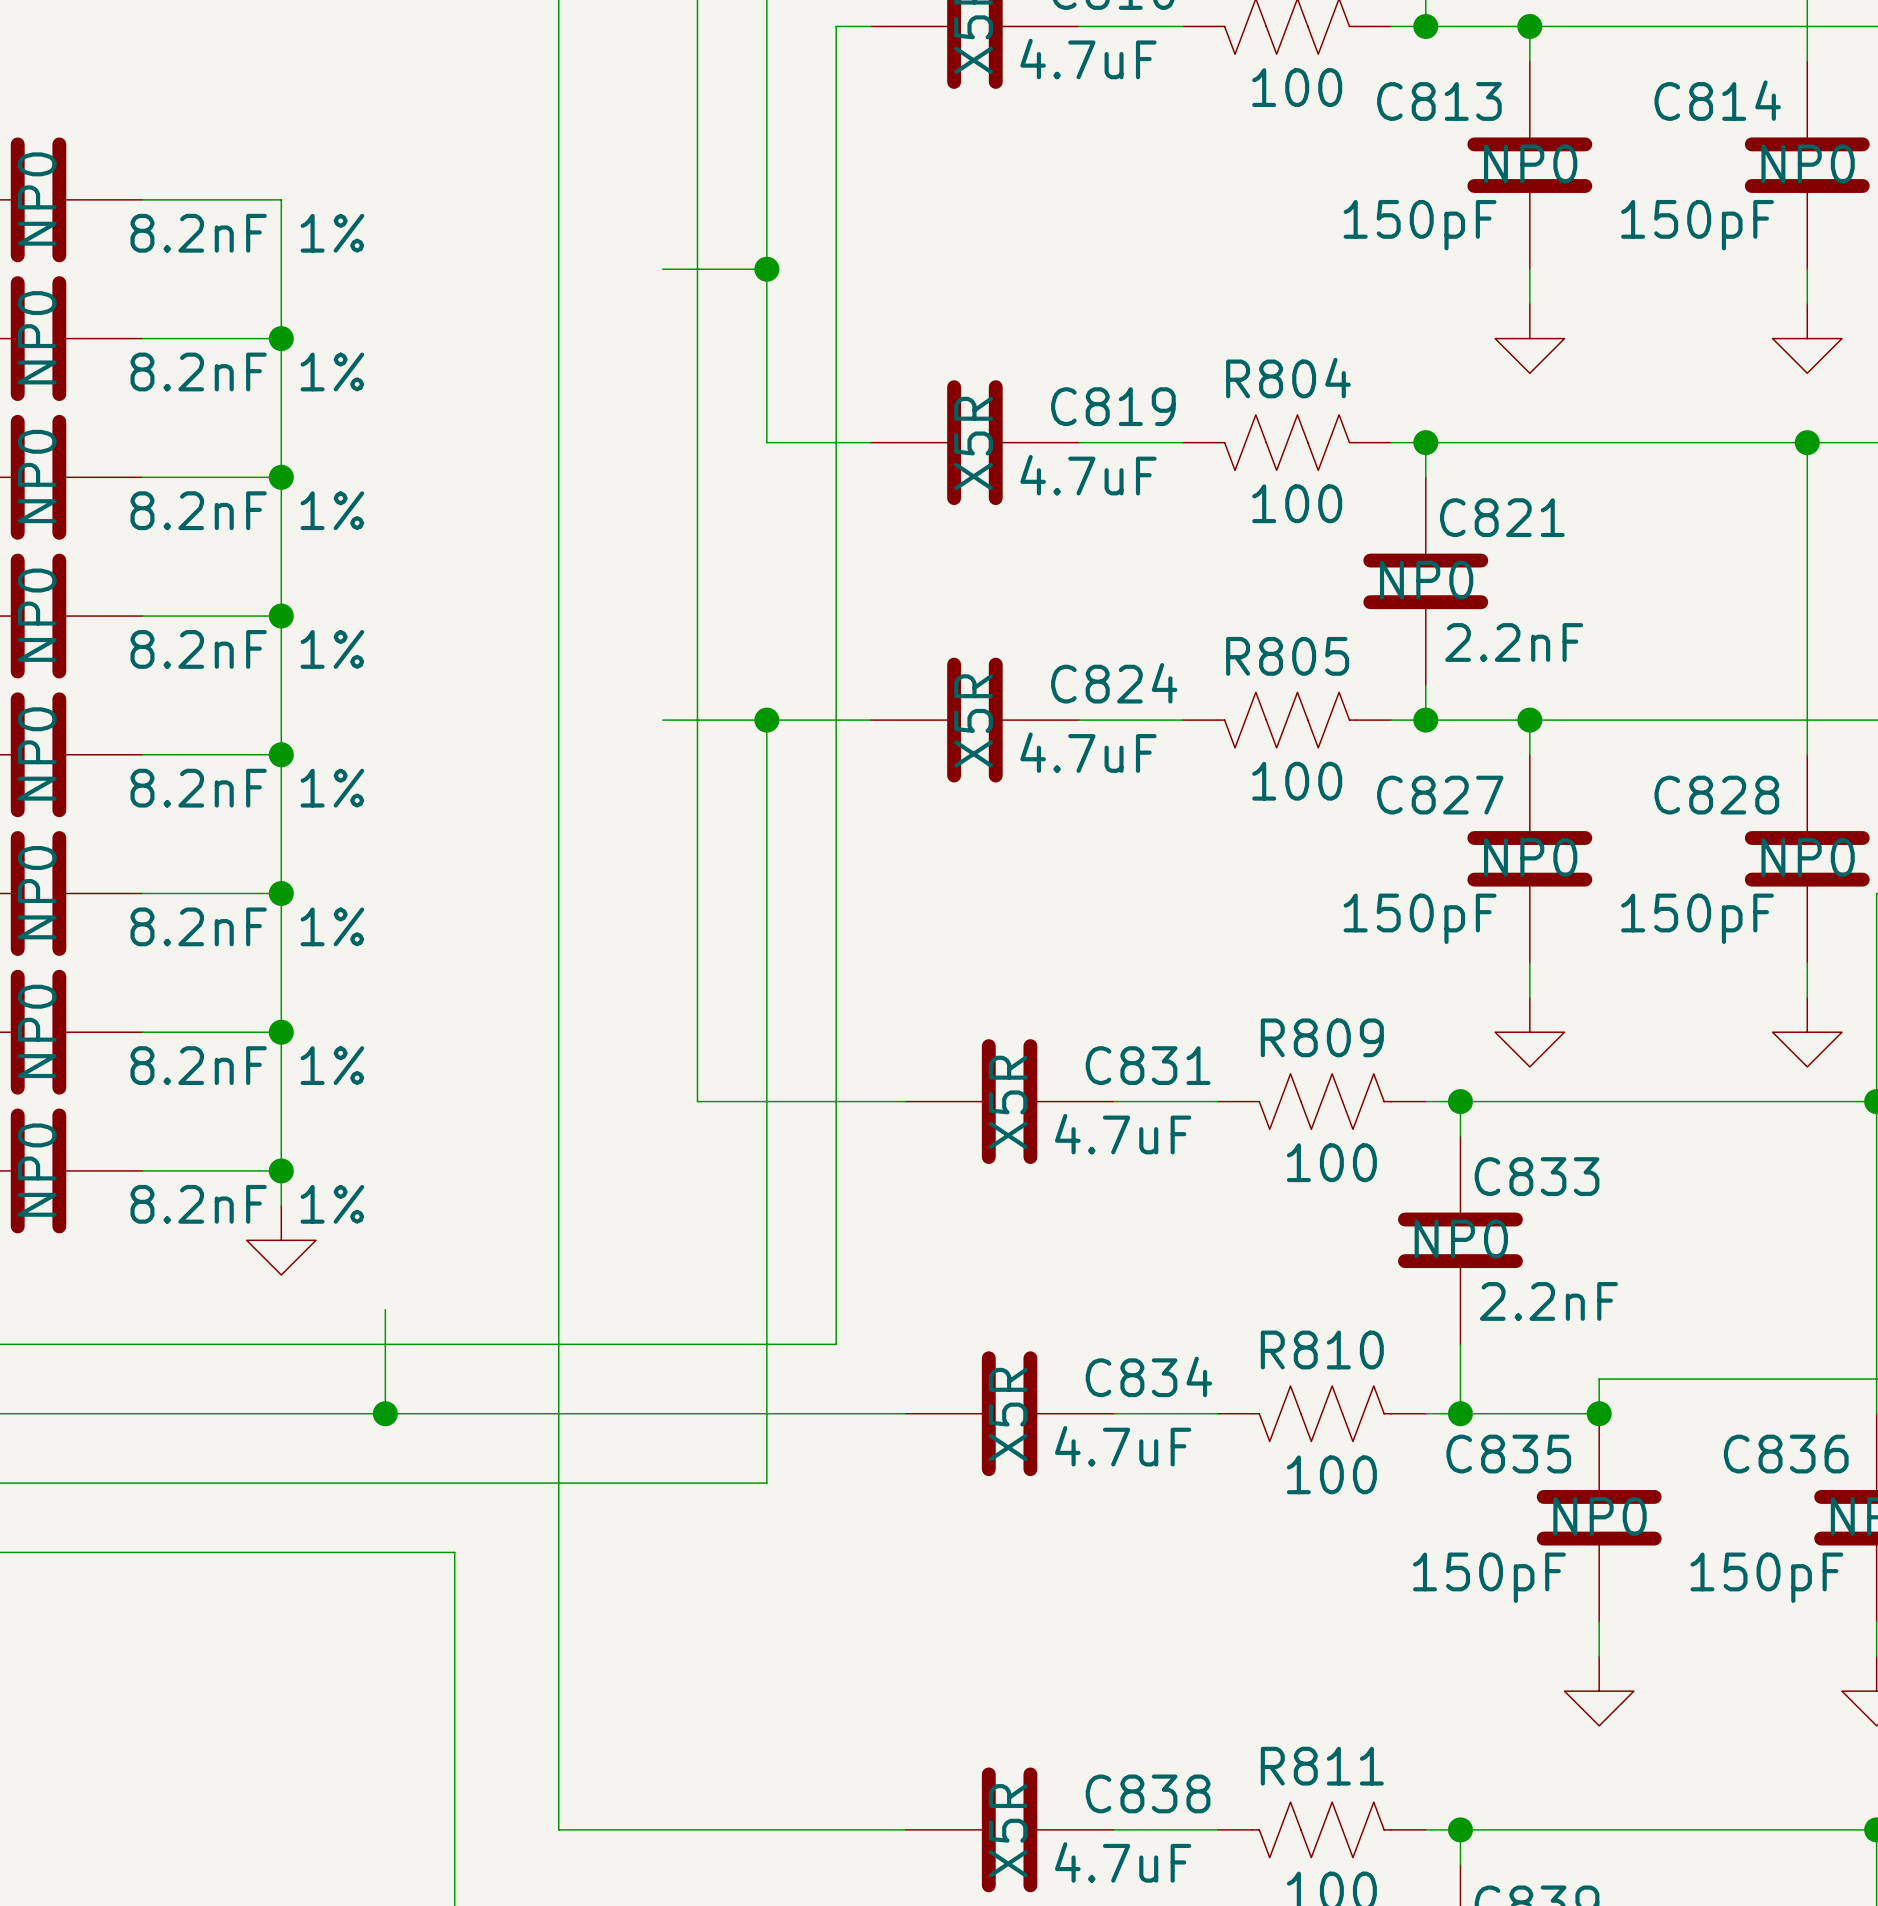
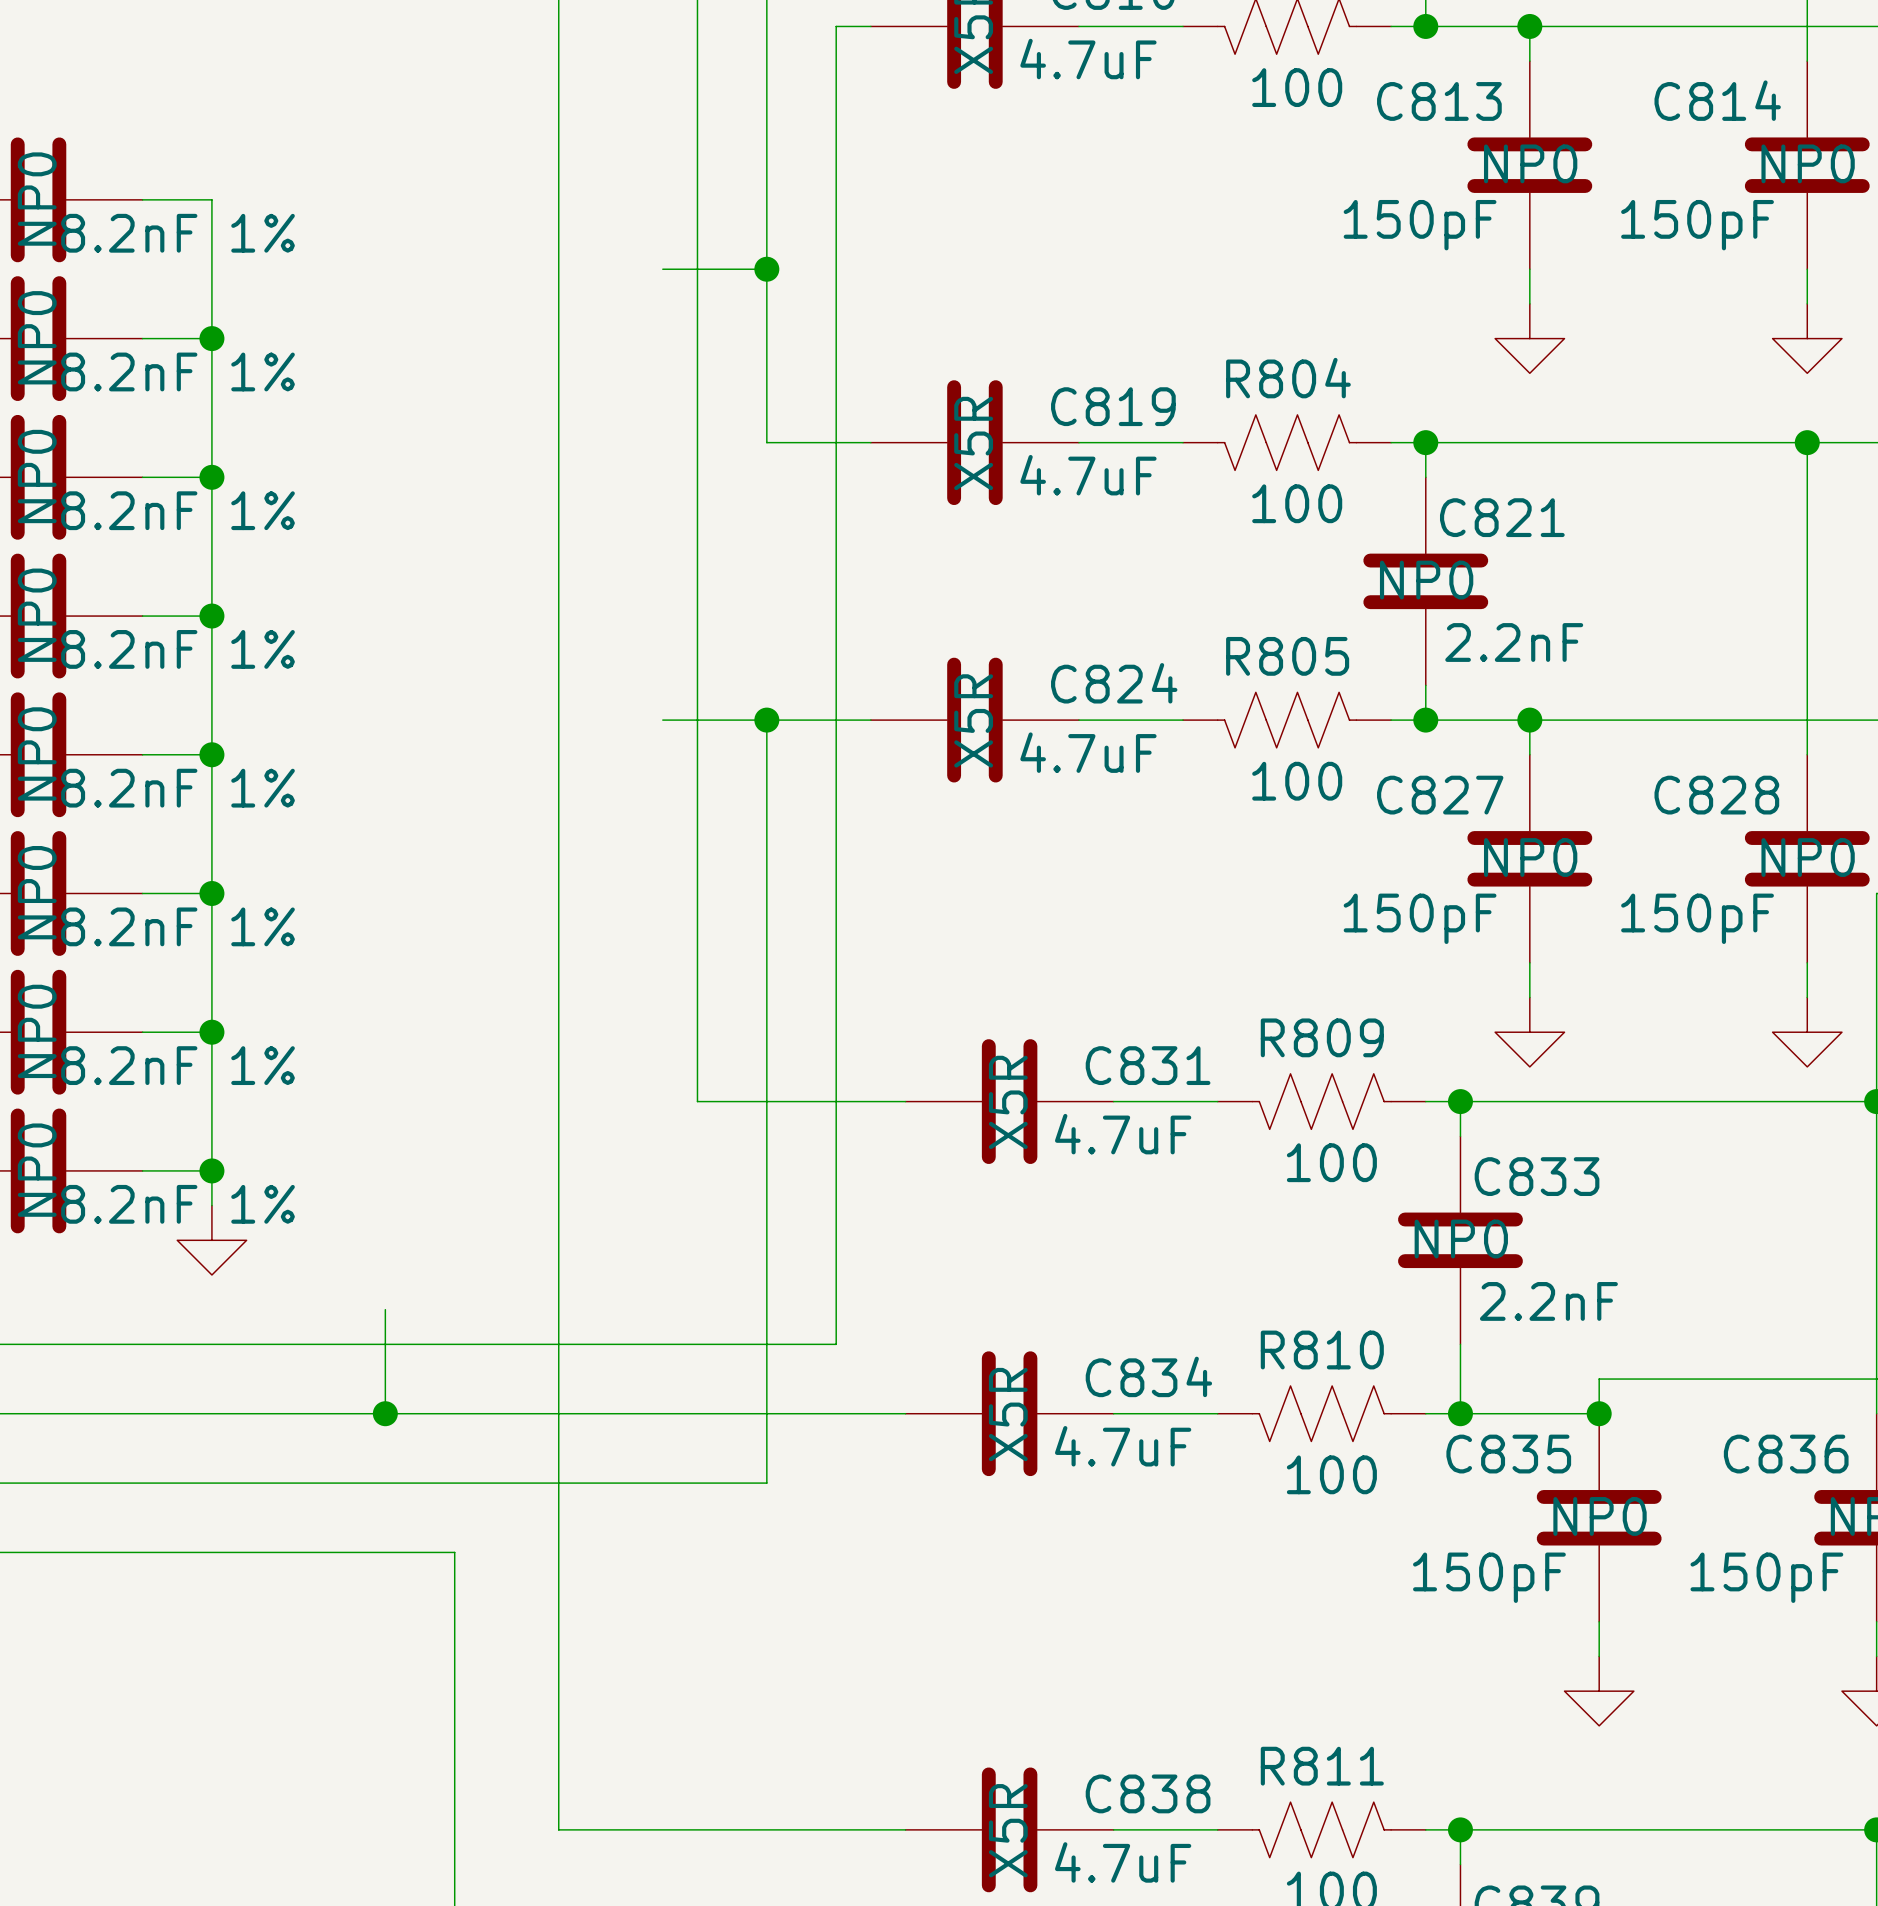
wire: (211, 199) (281, 199) (281, 1205) -> (211, 199) (211, 1205)
part value position: 8.2nF 1% (247, 233) -> 8.2nF 1% (177, 233)
wire: (211, 338) (281, 338) -> none
junction position: (281, 338) -> (211, 338)
part value position: 8.2nF 1% (247, 371) -> 8.2nF 1% (177, 371)
wire: (211, 477) (281, 477) -> none
junction position: (281, 477) -> (211, 477)
part value position: 8.2nF 1% (247, 510) -> 8.2nF 1% (177, 510)
wire: (211, 616) (281, 616) -> none
junction position: (281, 616) -> (211, 616)
part value position: 8.2nF 1% (247, 649) -> 8.2nF 1% (177, 649)
wire: (211, 754) (281, 754) -> none
junction position: (281, 754) -> (211, 754)
part value position: 8.2nF 1% (247, 788) -> 8.2nF 1% (177, 788)
wire: (211, 893) (281, 893) -> none
junction position: (281, 893) -> (211, 893)
part value position: 8.2nF 1% (247, 926) -> 8.2nF 1% (177, 926)
wire: (211, 1032) (281, 1032) -> none
junction position: (281, 1032) -> (211, 1032)
part value position: 8.2nF 1% (247, 1065) -> 8.2nF 1% (177, 1065)
wire: (211, 1170) (281, 1170) -> none
junction position: (281, 1170) -> (211, 1170)
part value position: 8.2nF 1% (247, 1204) -> 8.2nF 1% (177, 1204)
power symbol position: (281, 1240) -> (211, 1240)

